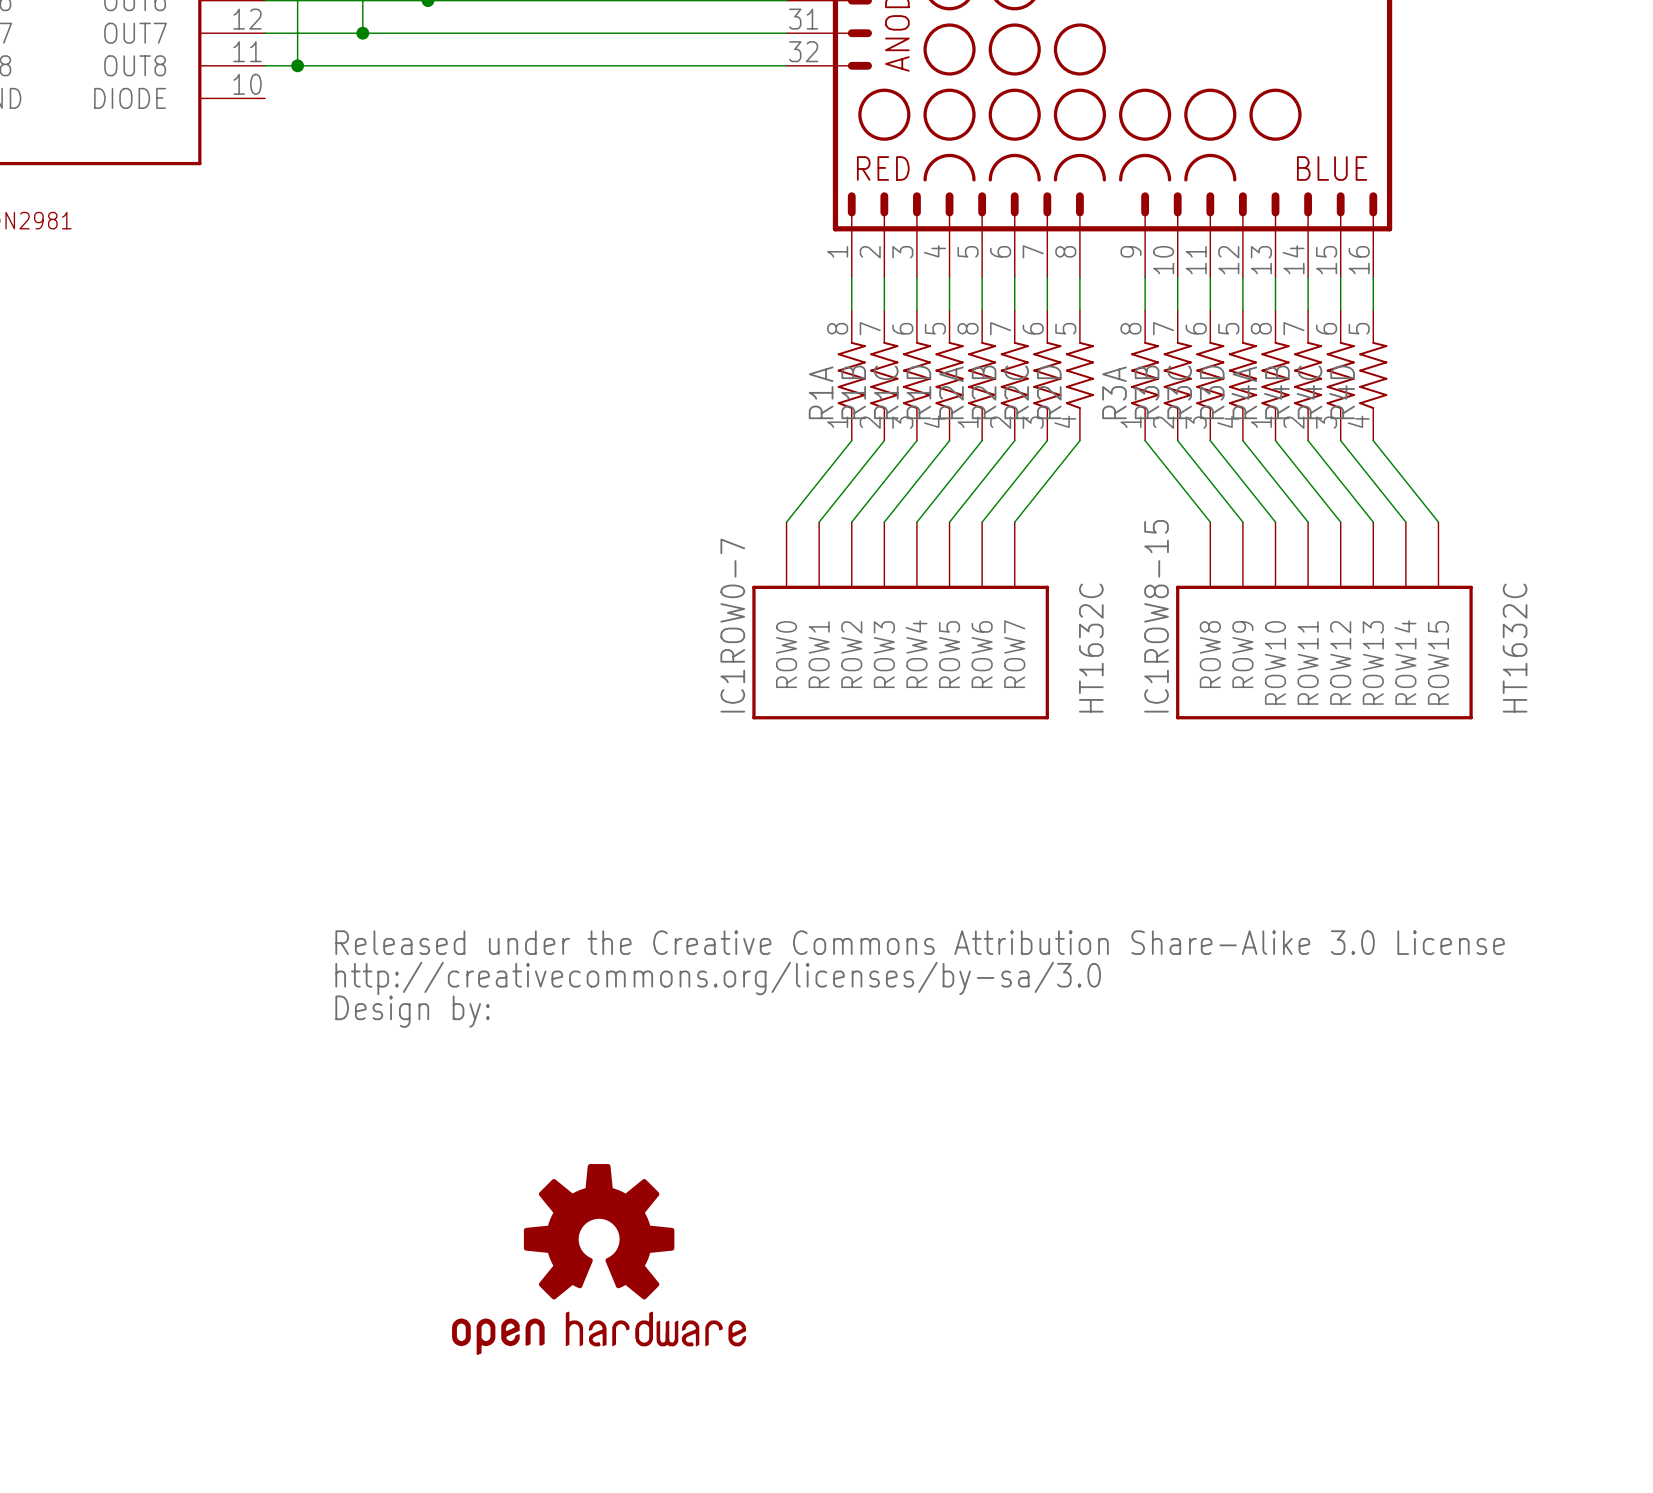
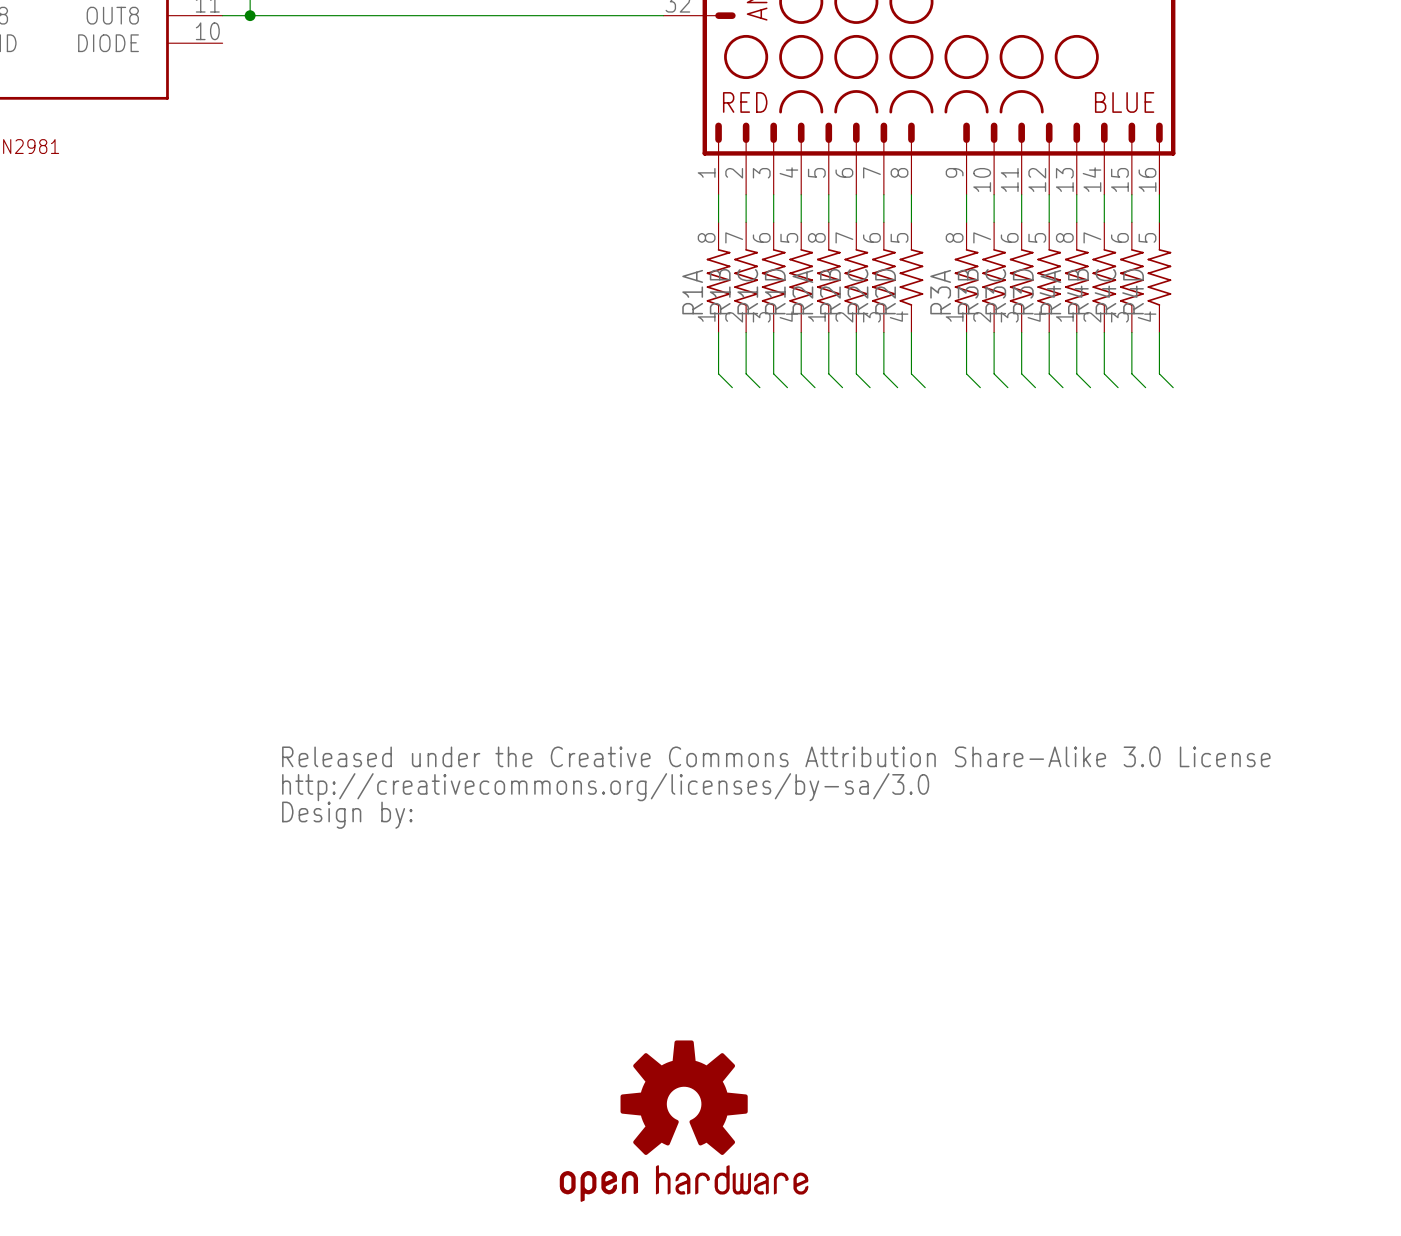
wire: (851, 440) (786, 522) -> (718, 332) (718, 373) (732, 387)
wire: (884, 440) (819, 522) -> (746, 332) (746, 373) (759, 387)
wire: (916, 440) (851, 522) -> (773, 332) (773, 373) (787, 387)
wire: (949, 440) (884, 522) -> (801, 332) (801, 373) (815, 387)
wire: (982, 440) (916, 522) -> (828, 332) (828, 373) (842, 387)
wire: (1014, 440) (949, 522) -> (856, 332) (856, 373) (870, 387)
wire: (1047, 440) (982, 522) -> (883, 332) (883, 373) (897, 387)
wire: (1079, 440) (1014, 522) -> (911, 332) (911, 373) (925, 387)
wire: (1145, 440) (1210, 522) -> (966, 332) (966, 373) (980, 387)
wire: (1177, 440) (1242, 522) -> (994, 332) (994, 373) (1007, 387)
wire: (1210, 440) (1275, 522) -> (1021, 332) (1021, 373) (1035, 387)
wire: (1242, 440) (1308, 522) -> (1049, 332) (1049, 373) (1062, 387)
wire: (1275, 440) (1340, 522) -> (1076, 332) (1076, 373) (1090, 387)
wire: (1308, 440) (1373, 522) -> (1104, 332) (1104, 373) (1118, 387)
wire: (1340, 440) (1405, 522) -> (1131, 332) (1131, 373) (1145, 387)
wire: (1373, 440) (1438, 522) -> (1159, 332) (1159, 373) (1173, 387)
IC1ROW0-7: HT1632C (900, 620) -> none
IC1ROW8-15: HT1632C (1324, 620) -> none
part position: (599, 1259) -> (684, 1121)

